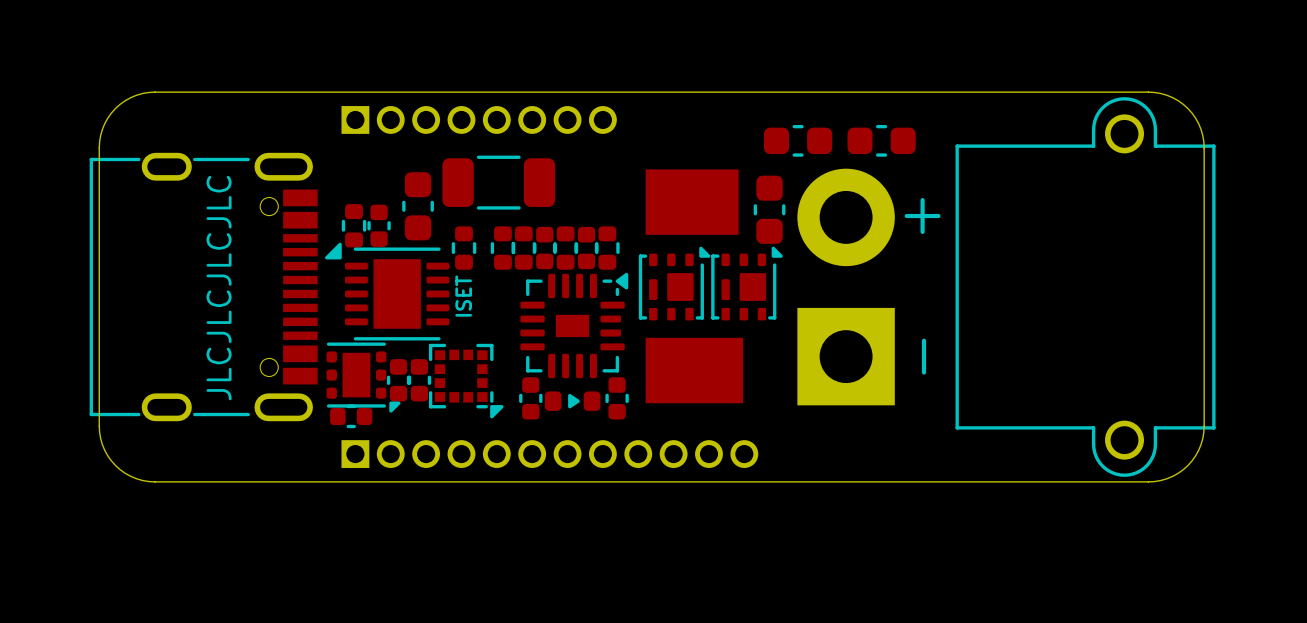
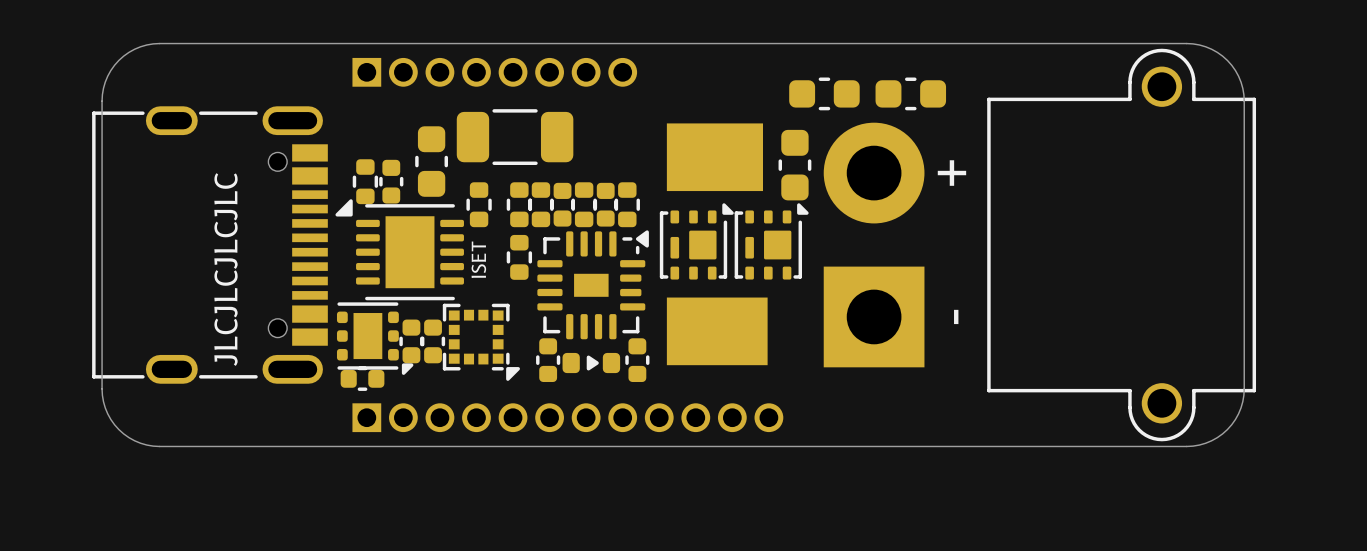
part: none -> (519, 257)

